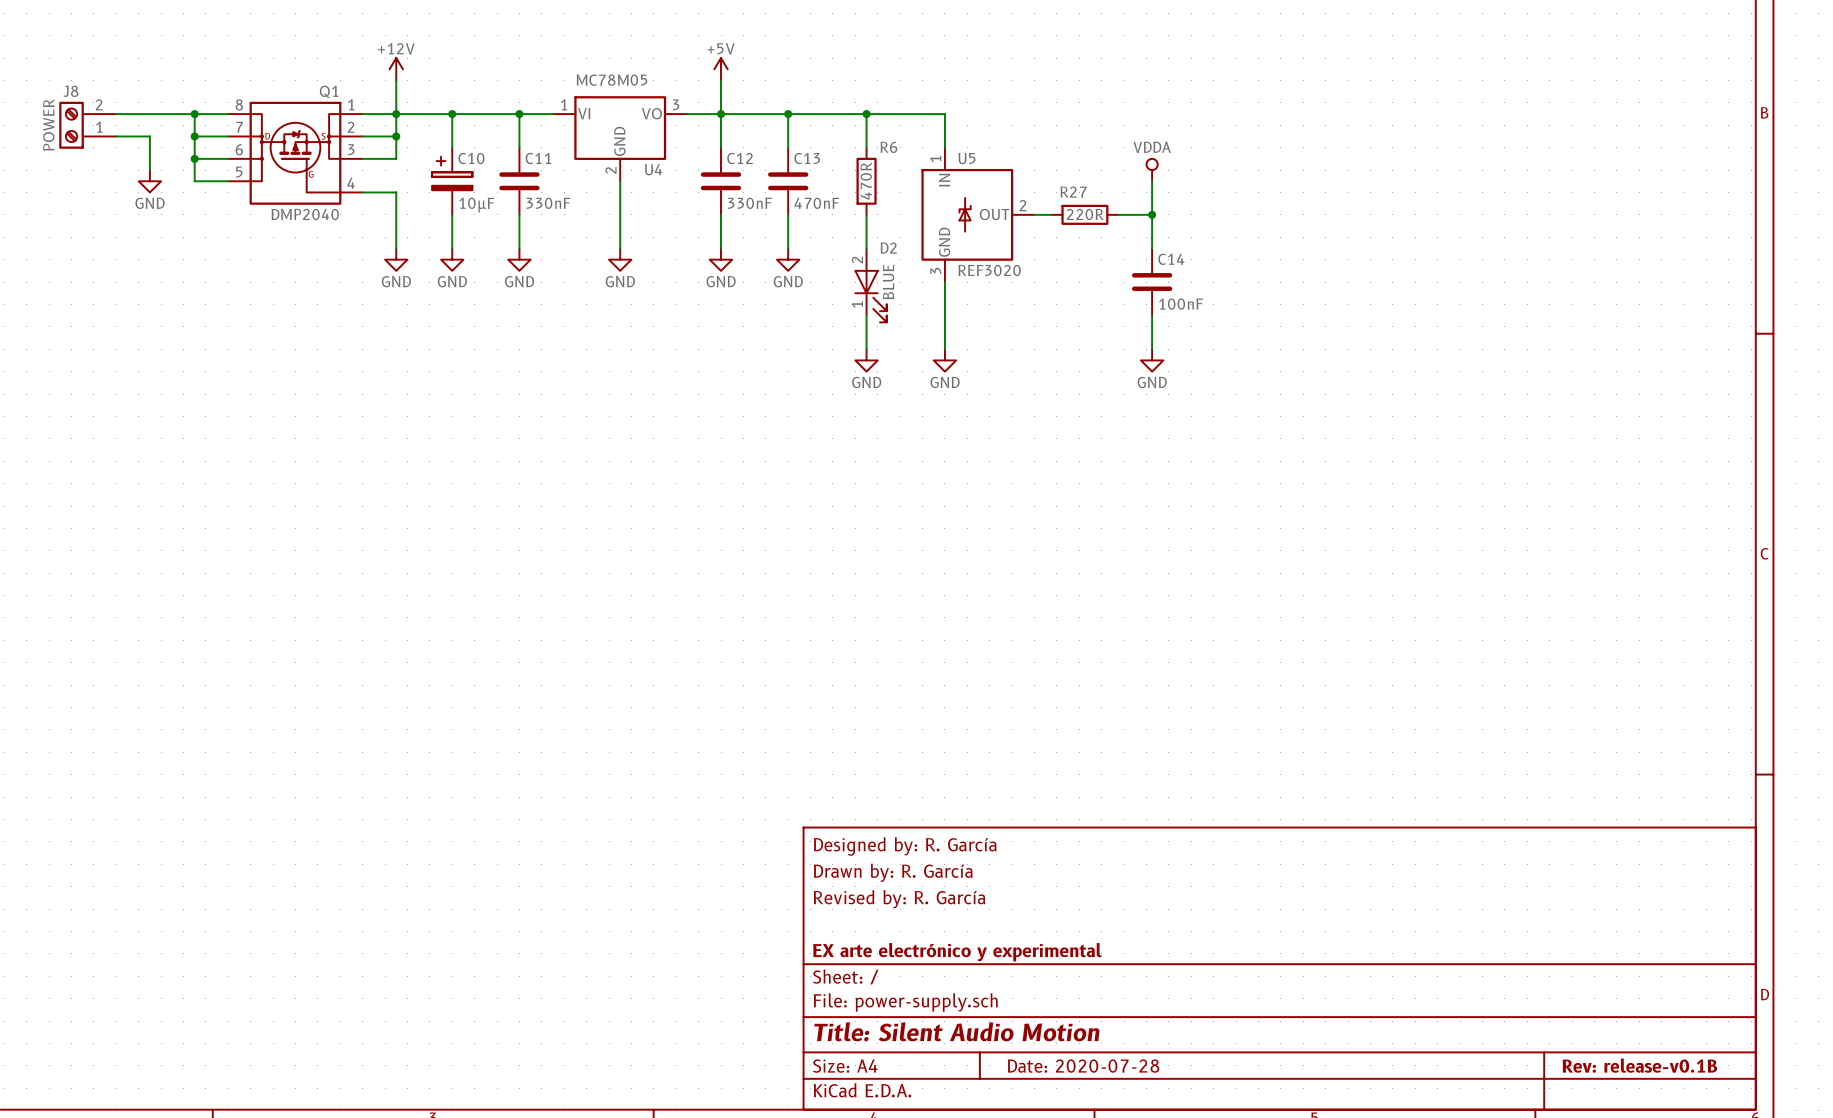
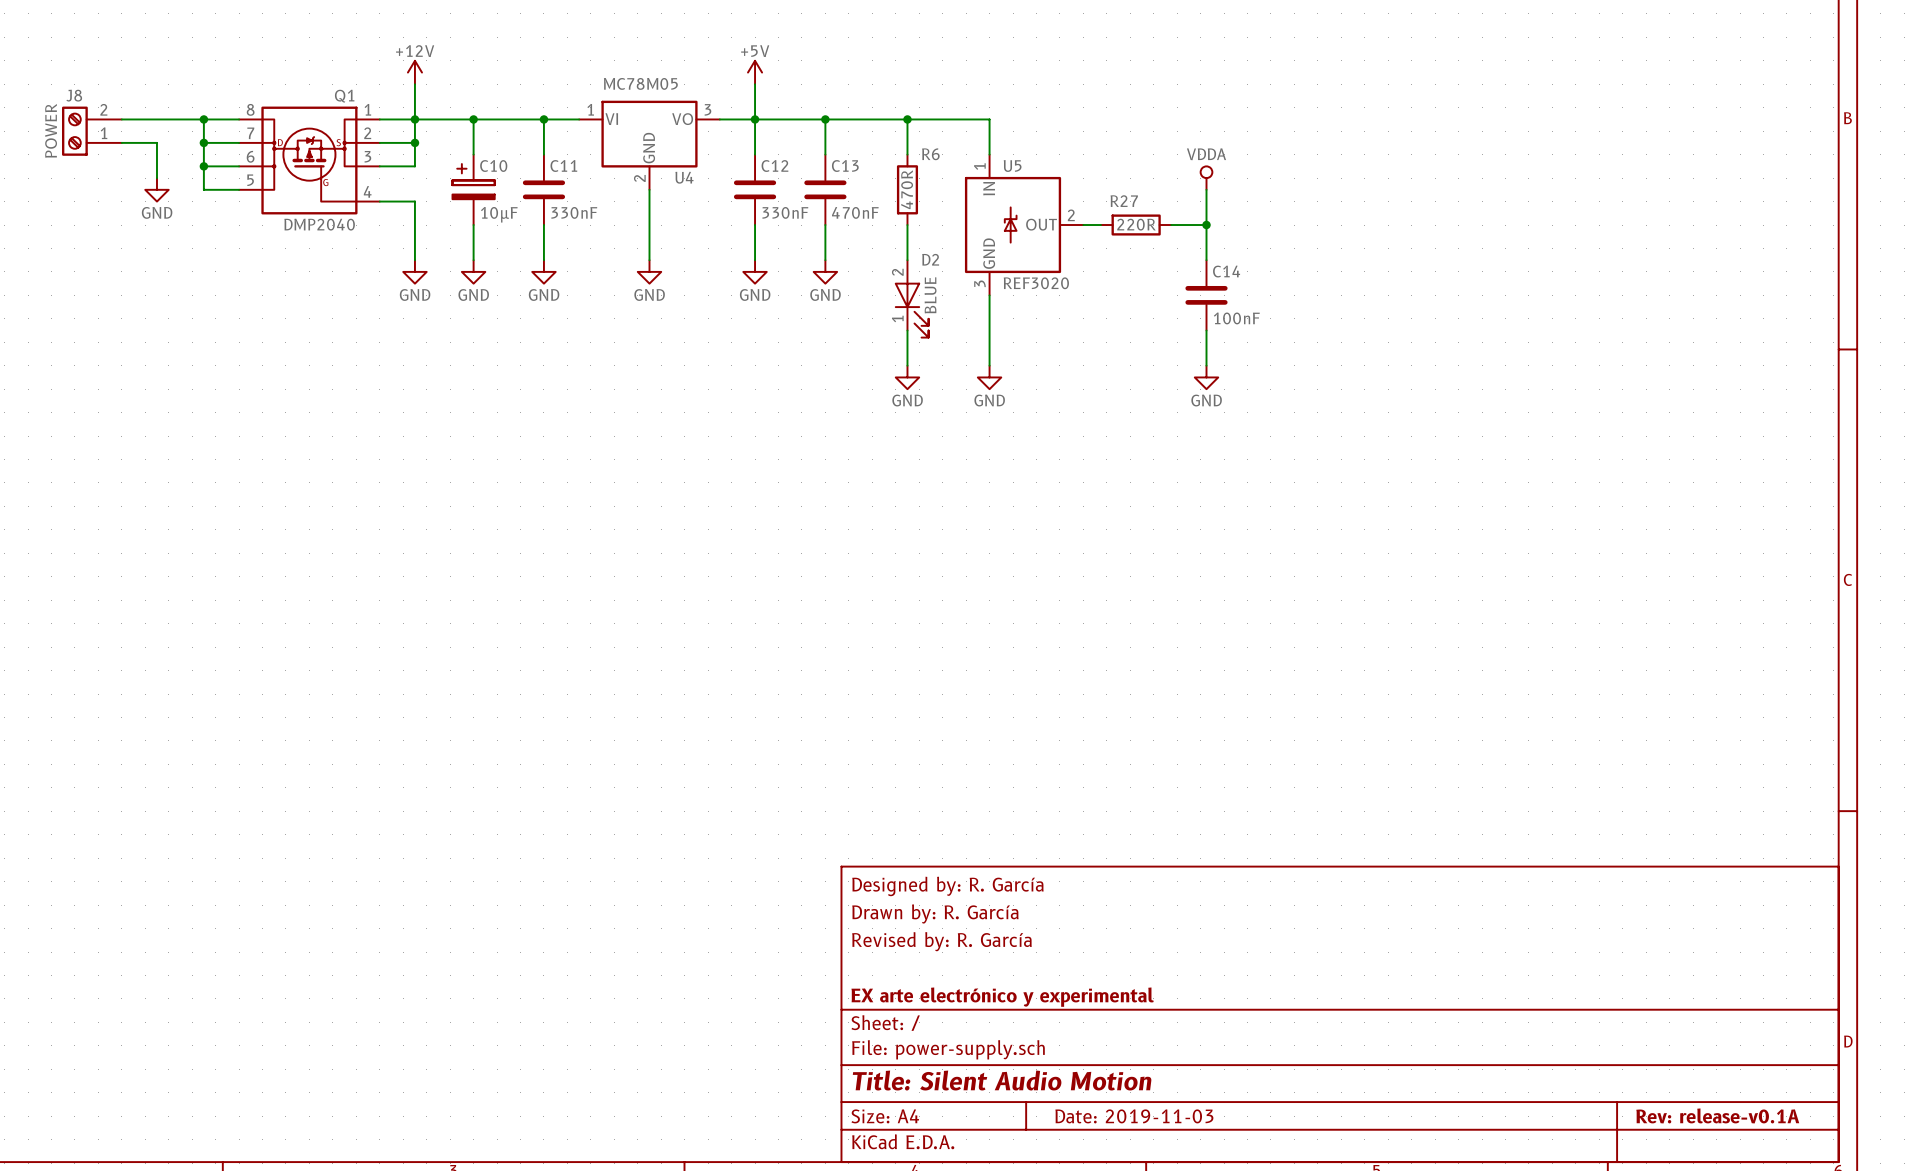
title block: Rev: release-v0.1B (1639, 1065) -> Rev: release-v0.1A (1717, 1115)
title block: Date: 2020-07-28 (1083, 1066) -> Date: 2019-11-03 (1134, 1116)

